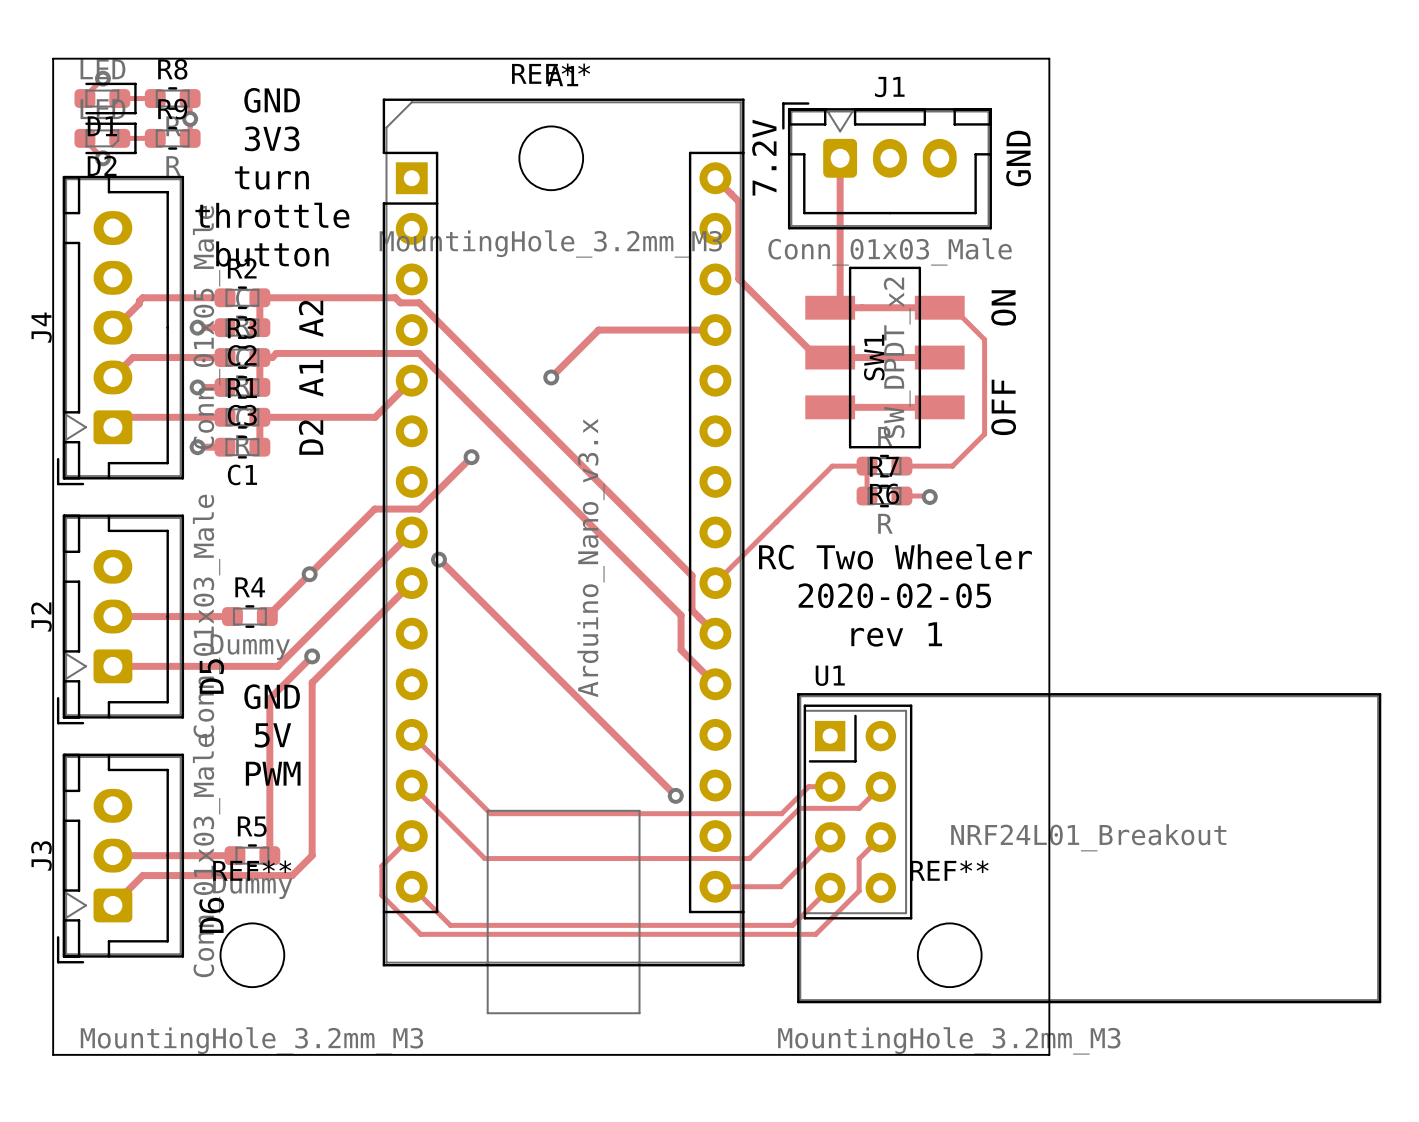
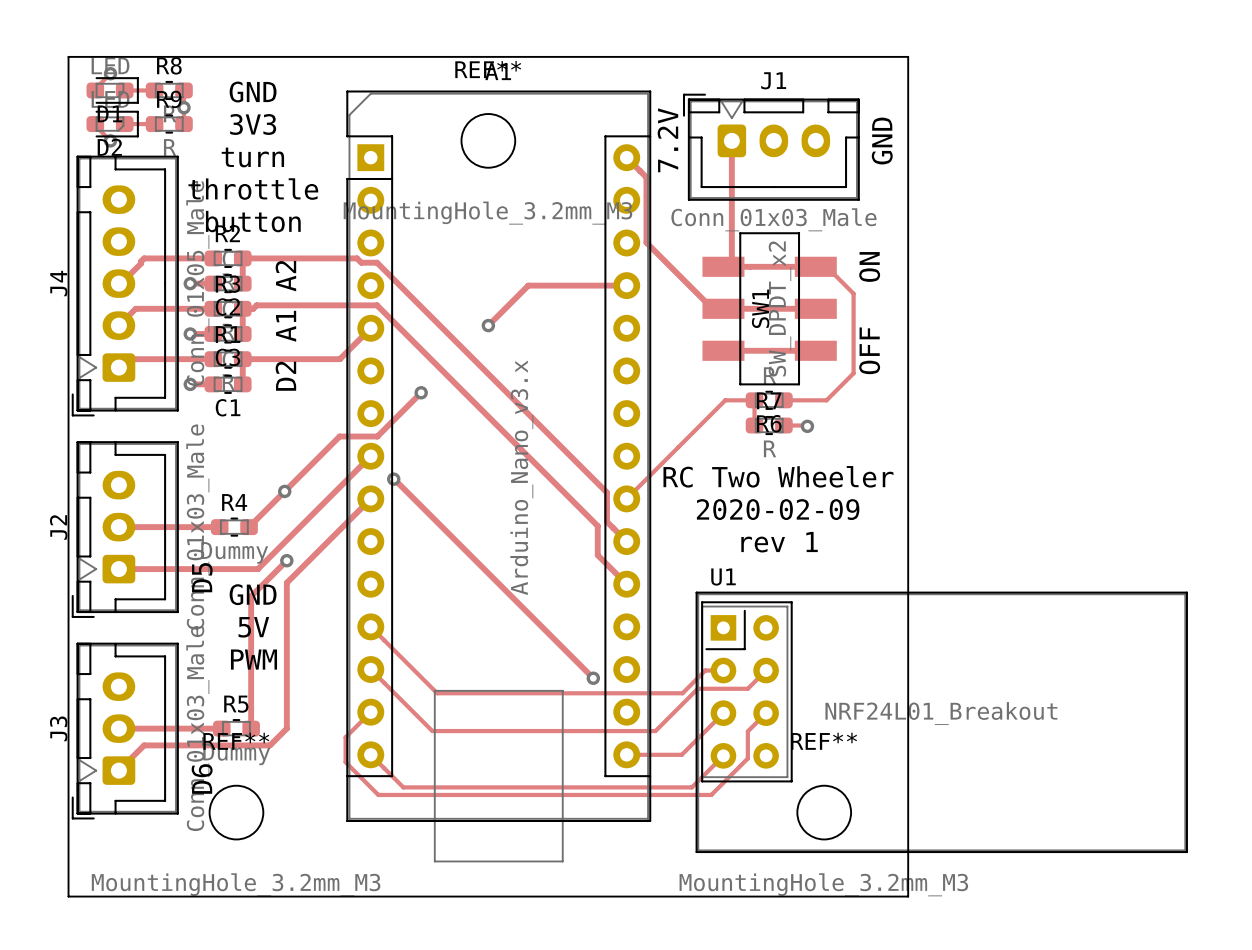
text: 2020-02-05 (894, 595) -> 2020-02-09 (778, 509)

